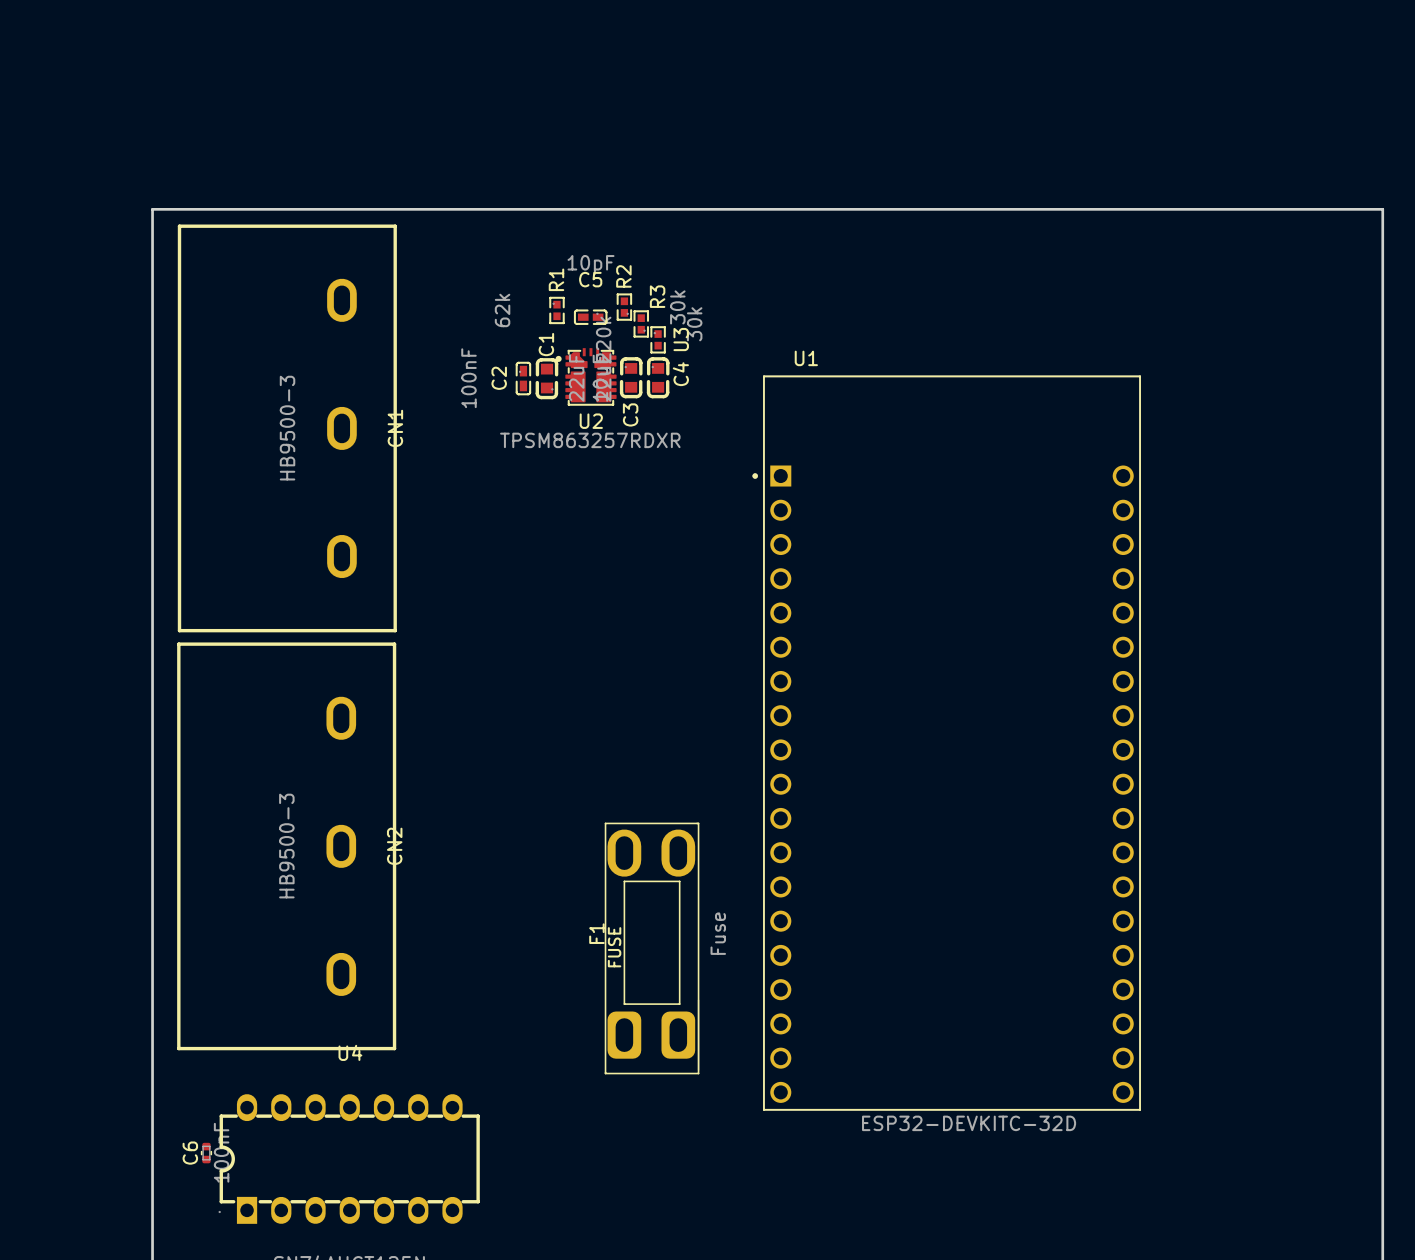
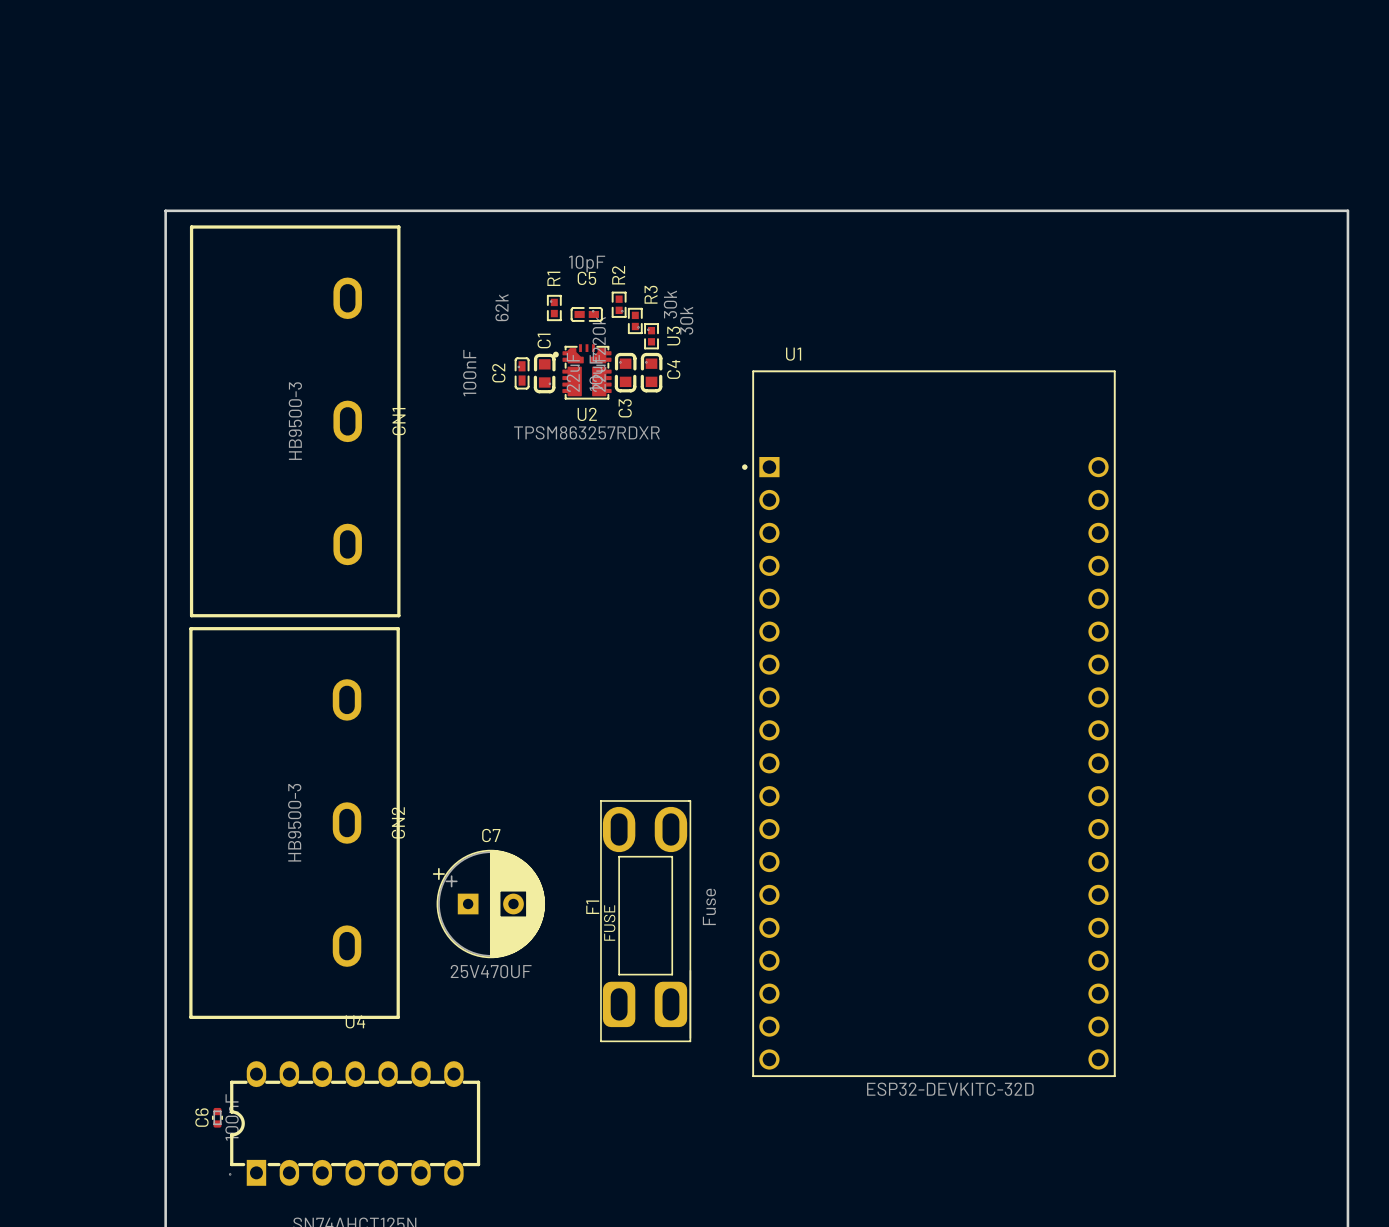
C7: none -> 25V470UF (488, 904)

